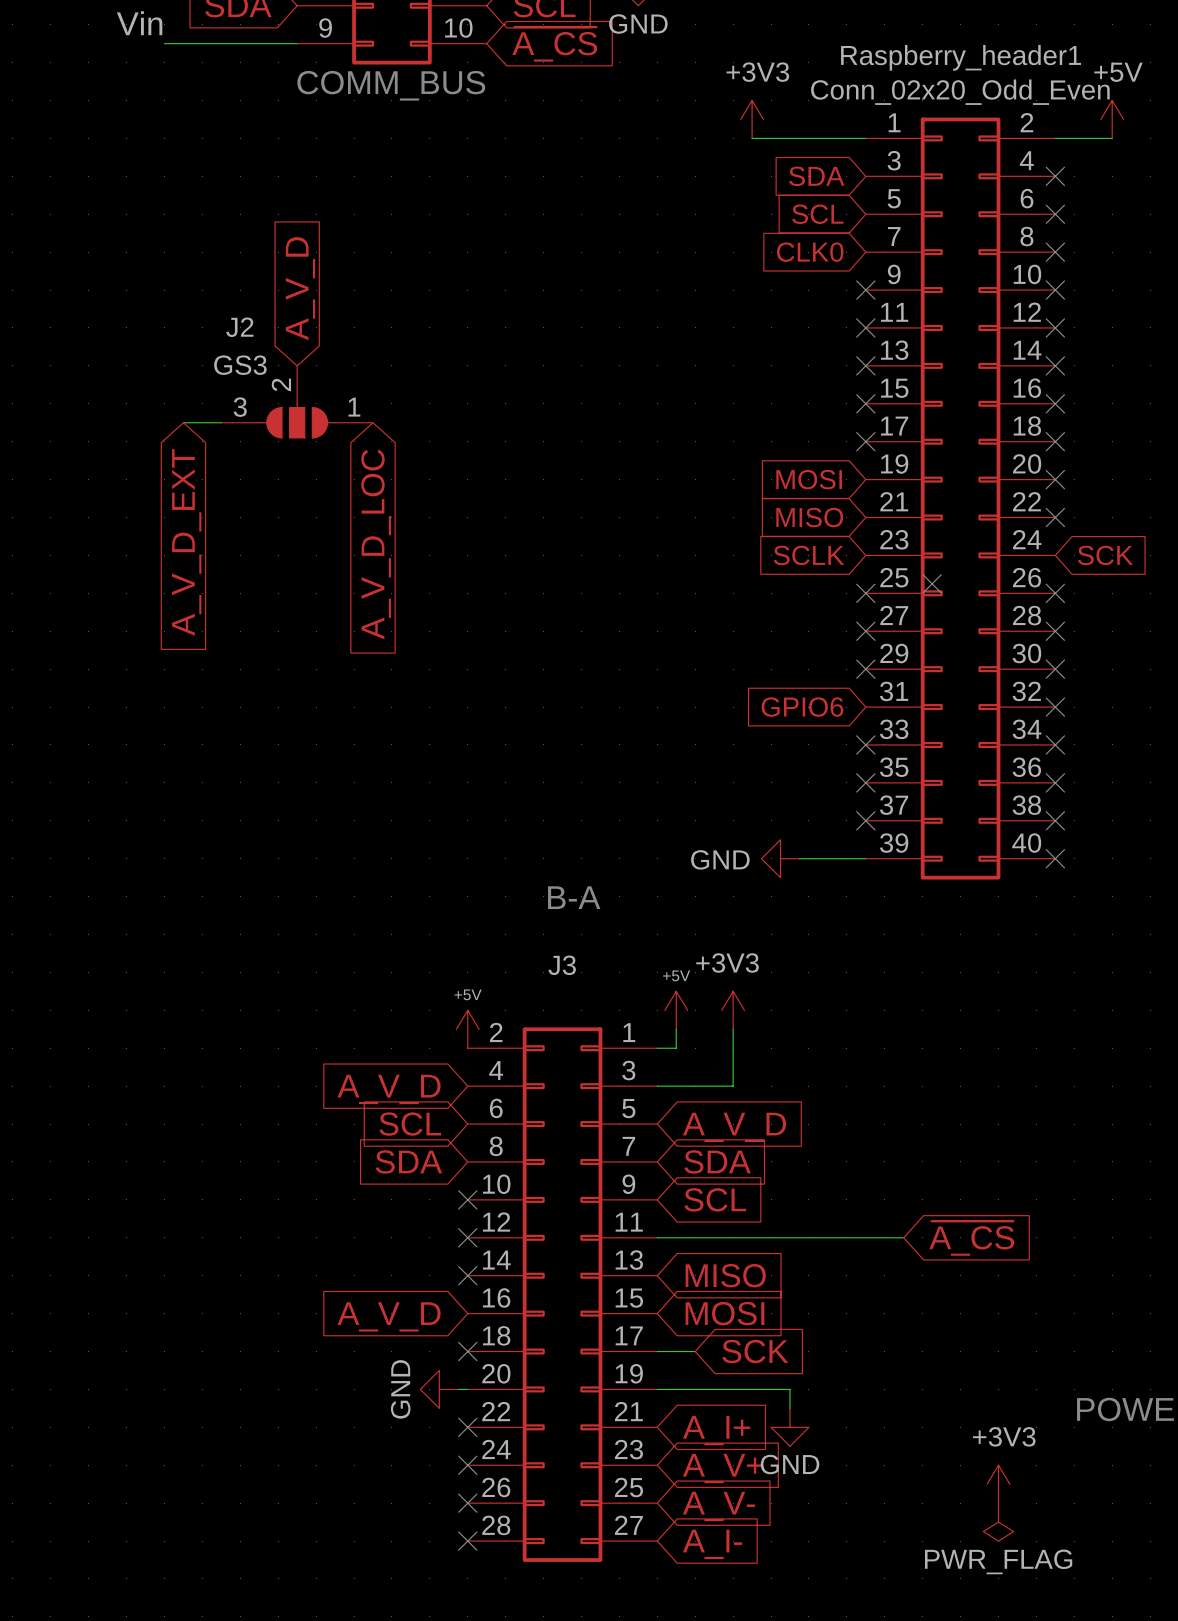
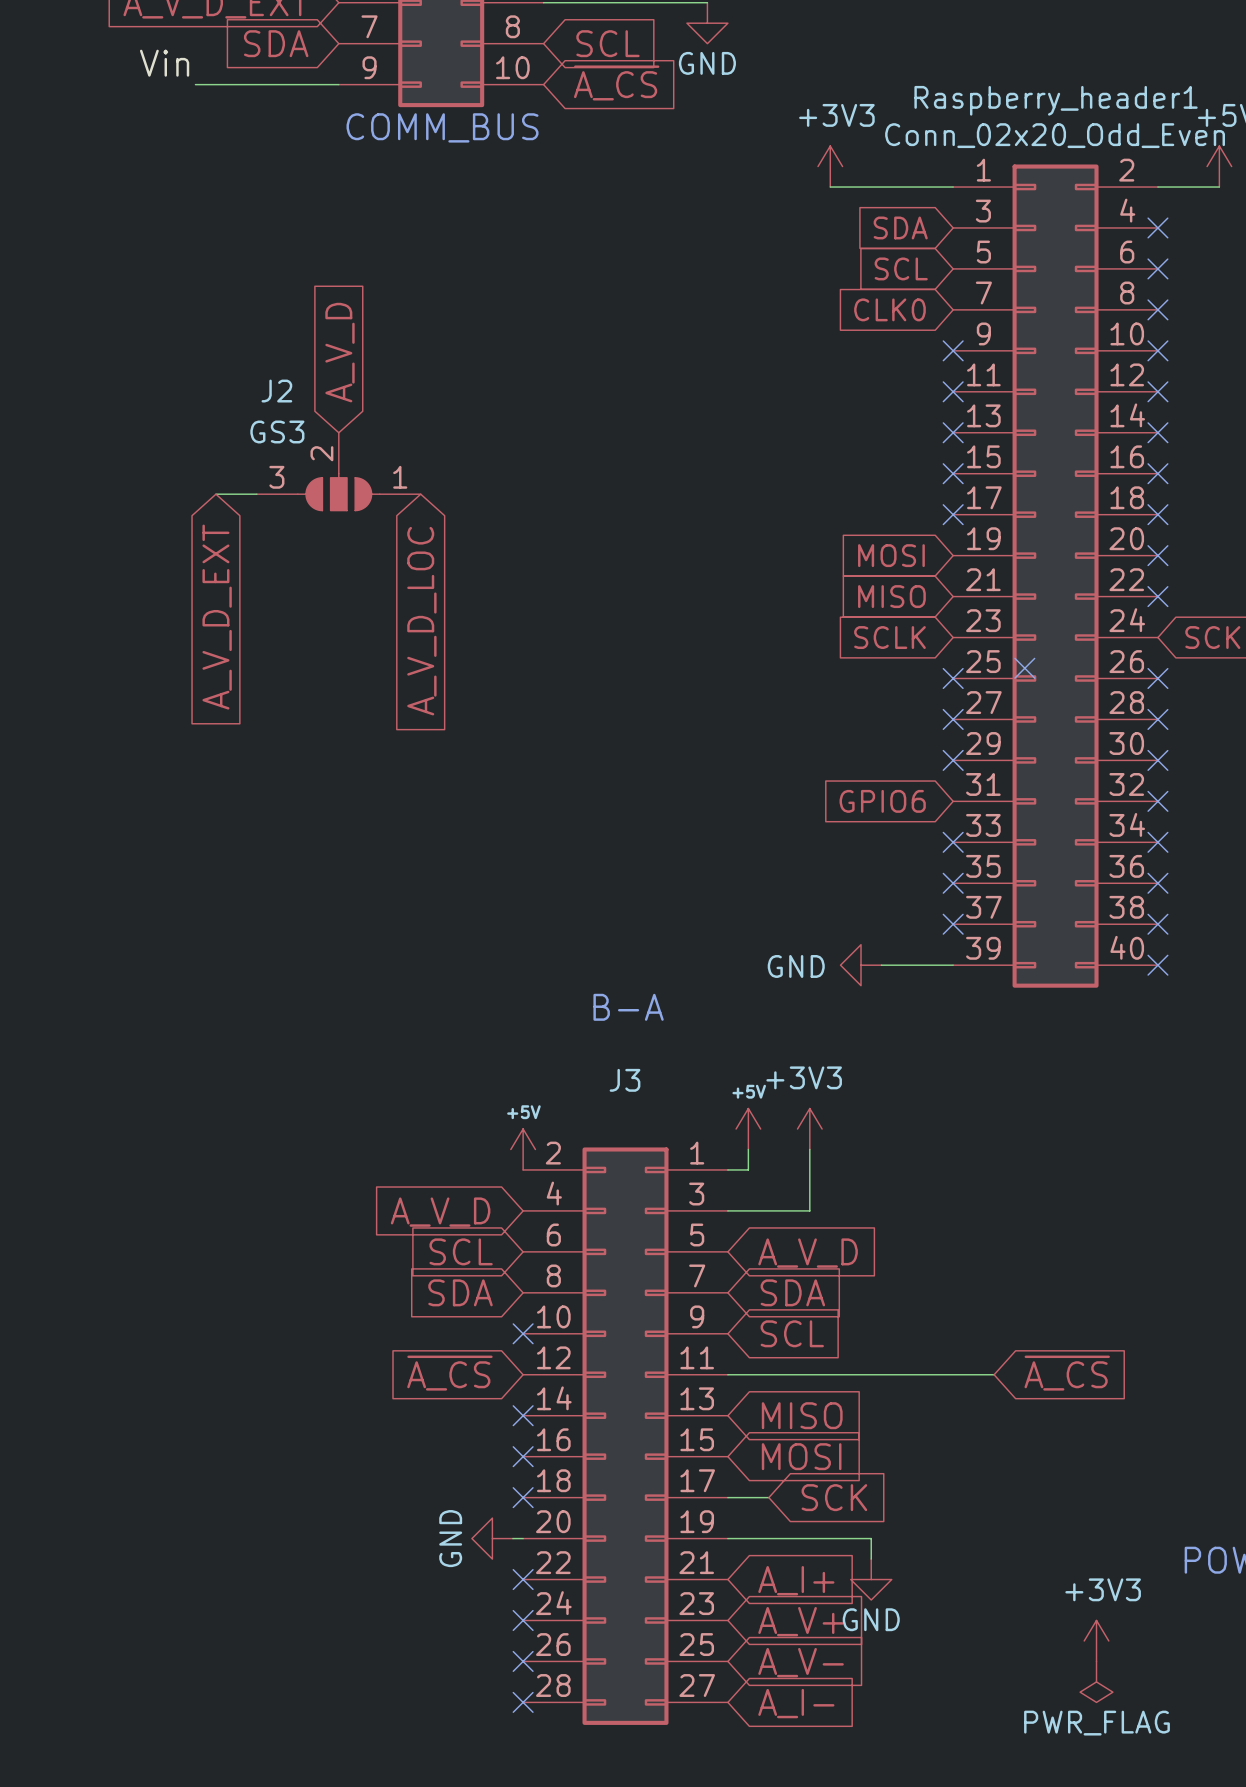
no-connect mark position: (467, 1237) -> (523, 1456)
global label: none -> ~{A_CS} (449, 1373)
global label: A_V_D (389, 1316) -> none

